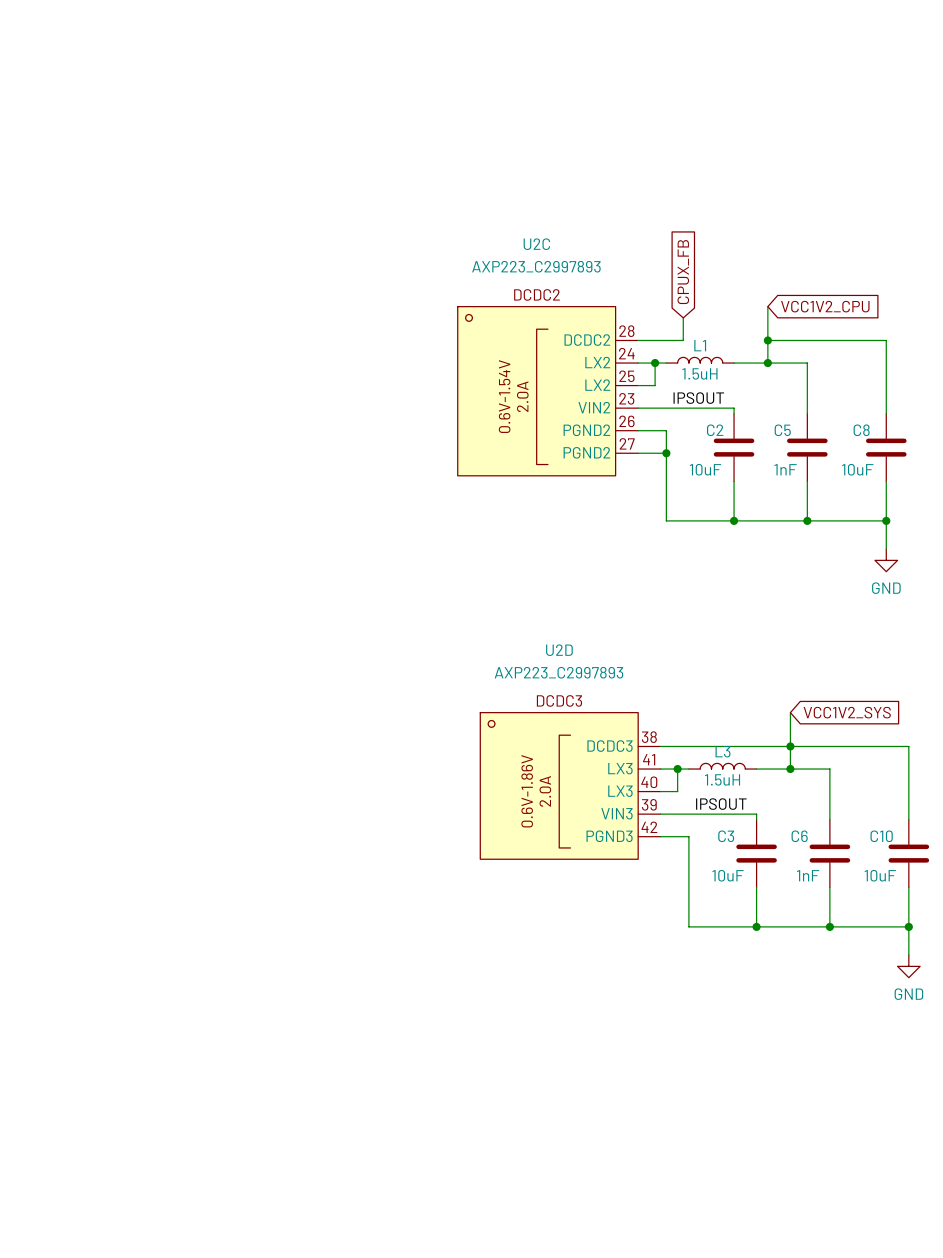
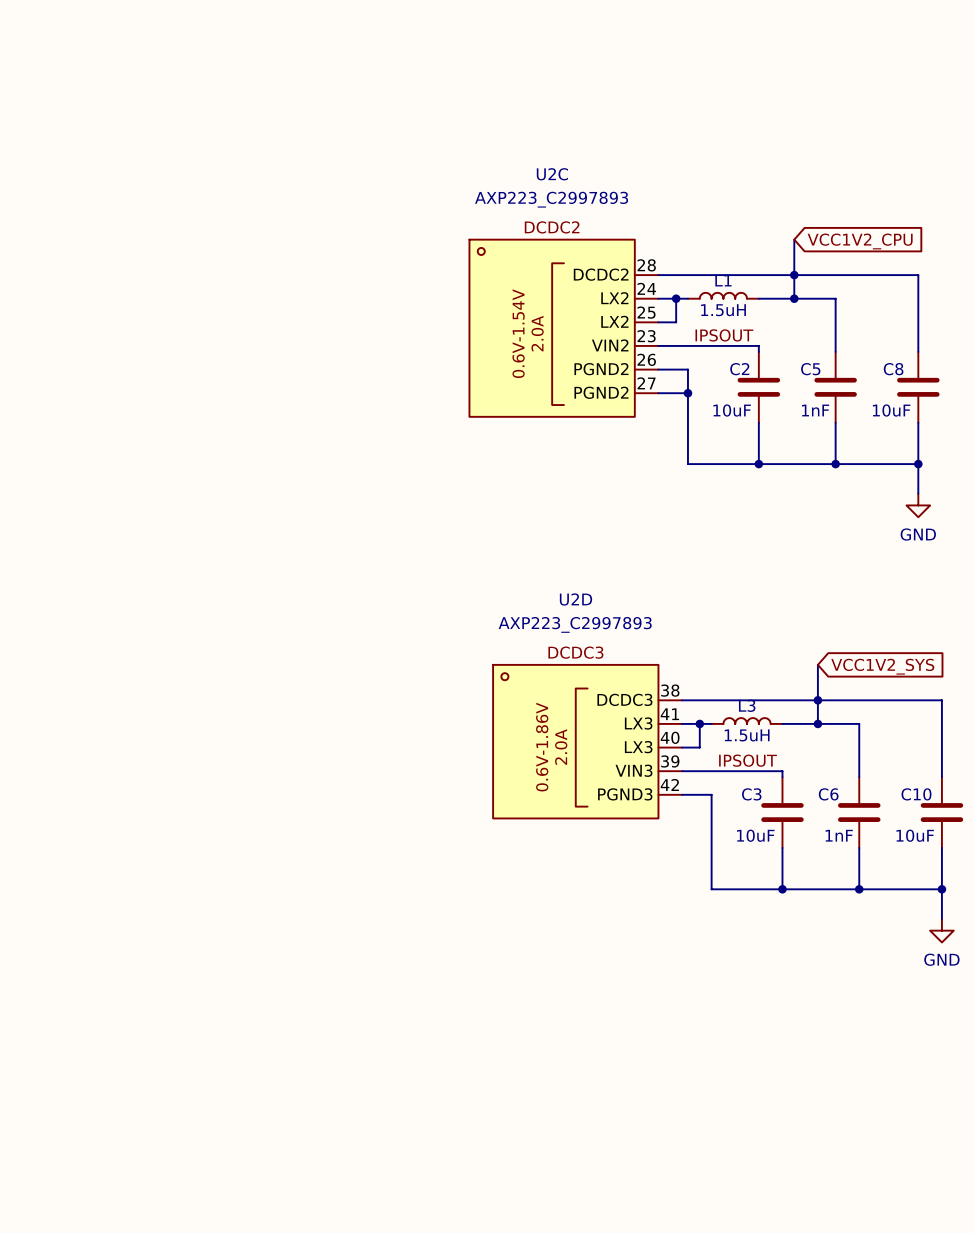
global label: CPUX_FB (683, 272) -> none
wire: (683, 317) (683, 340) -> (794, 275) (705, 275)

